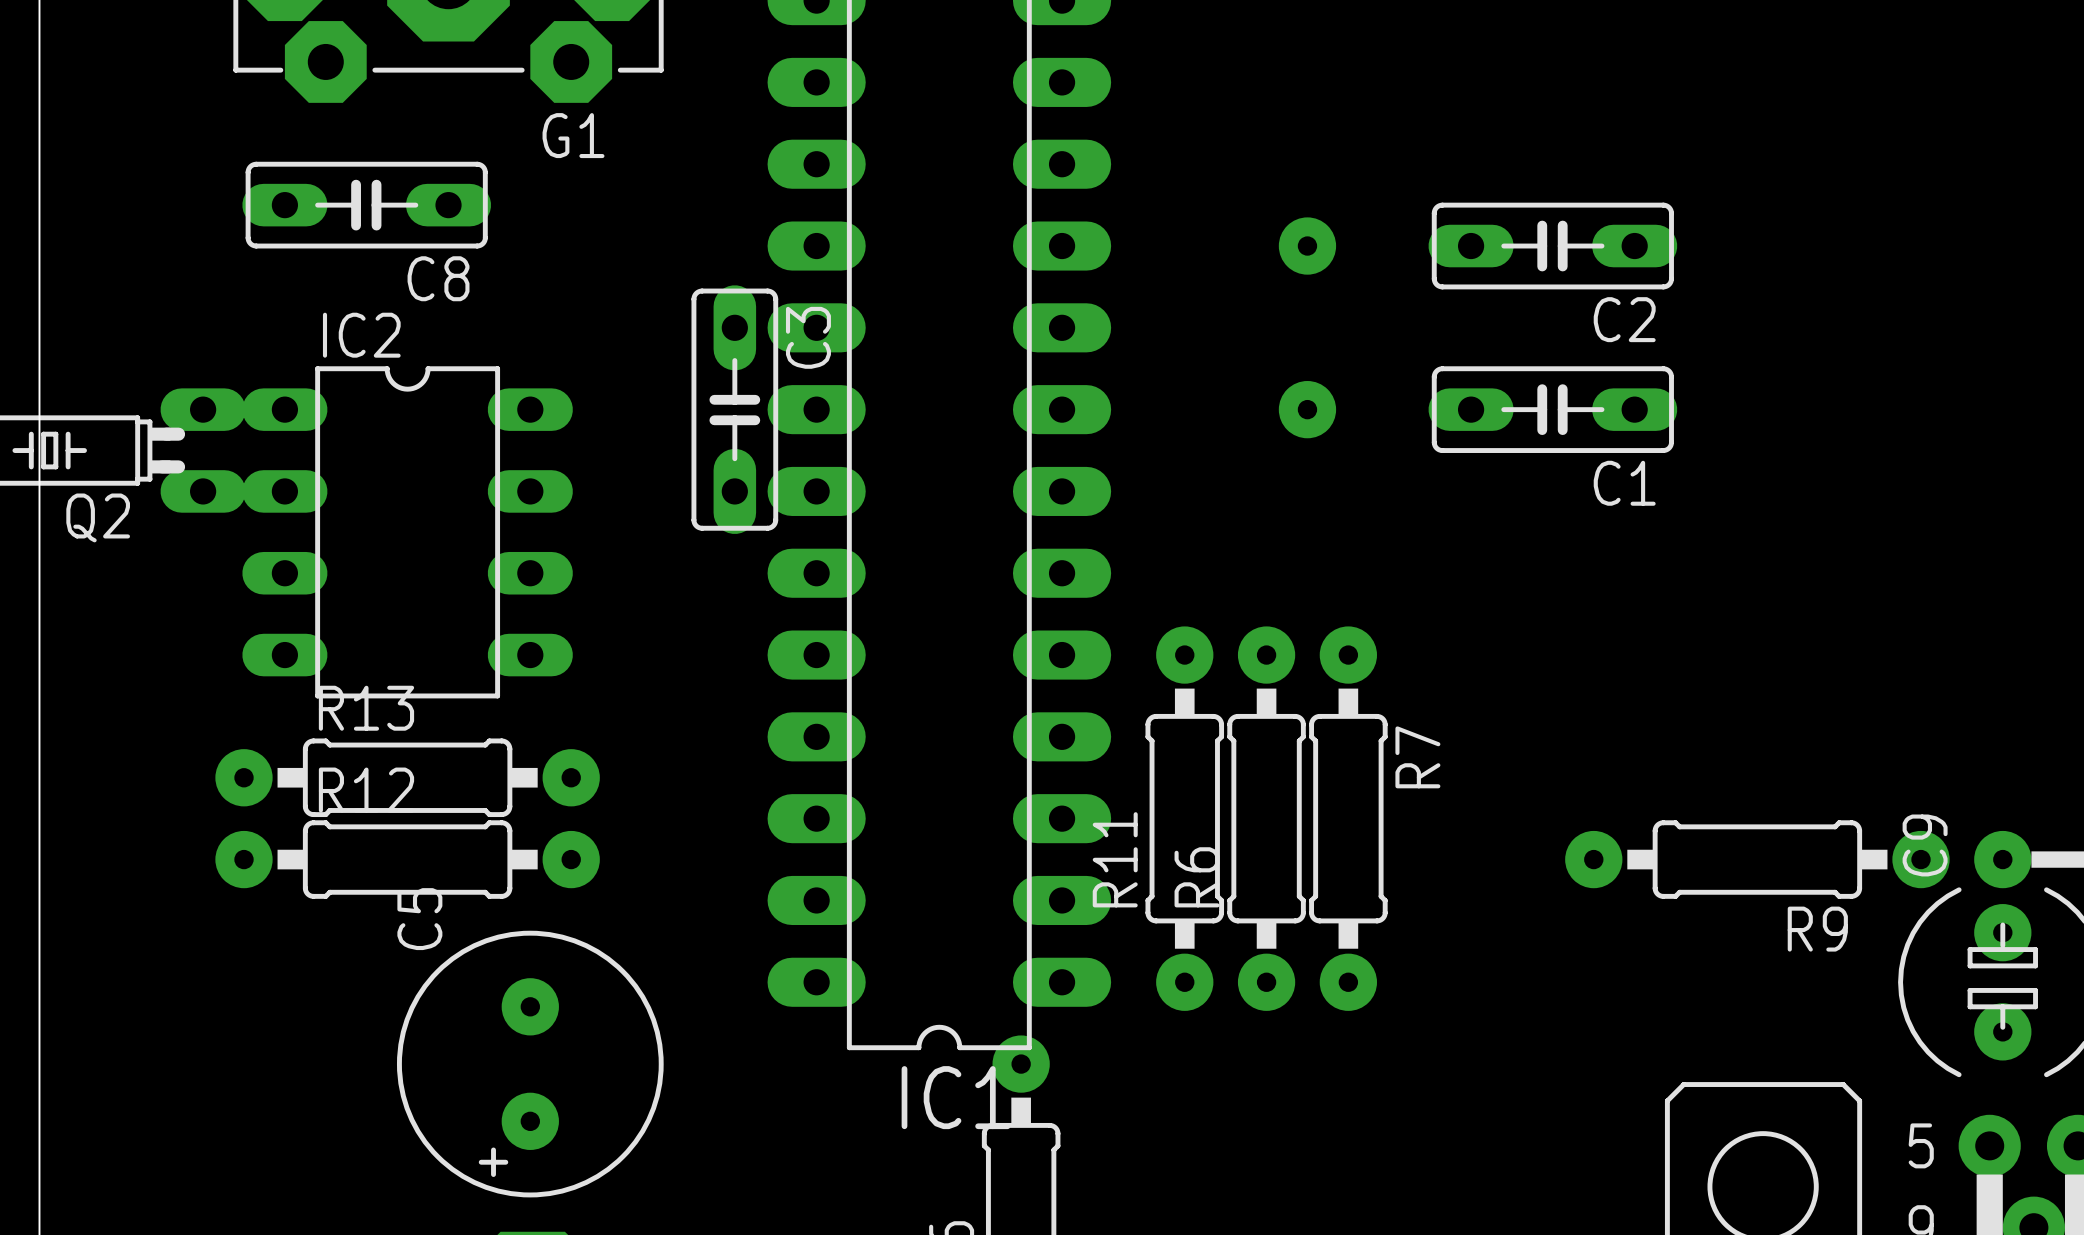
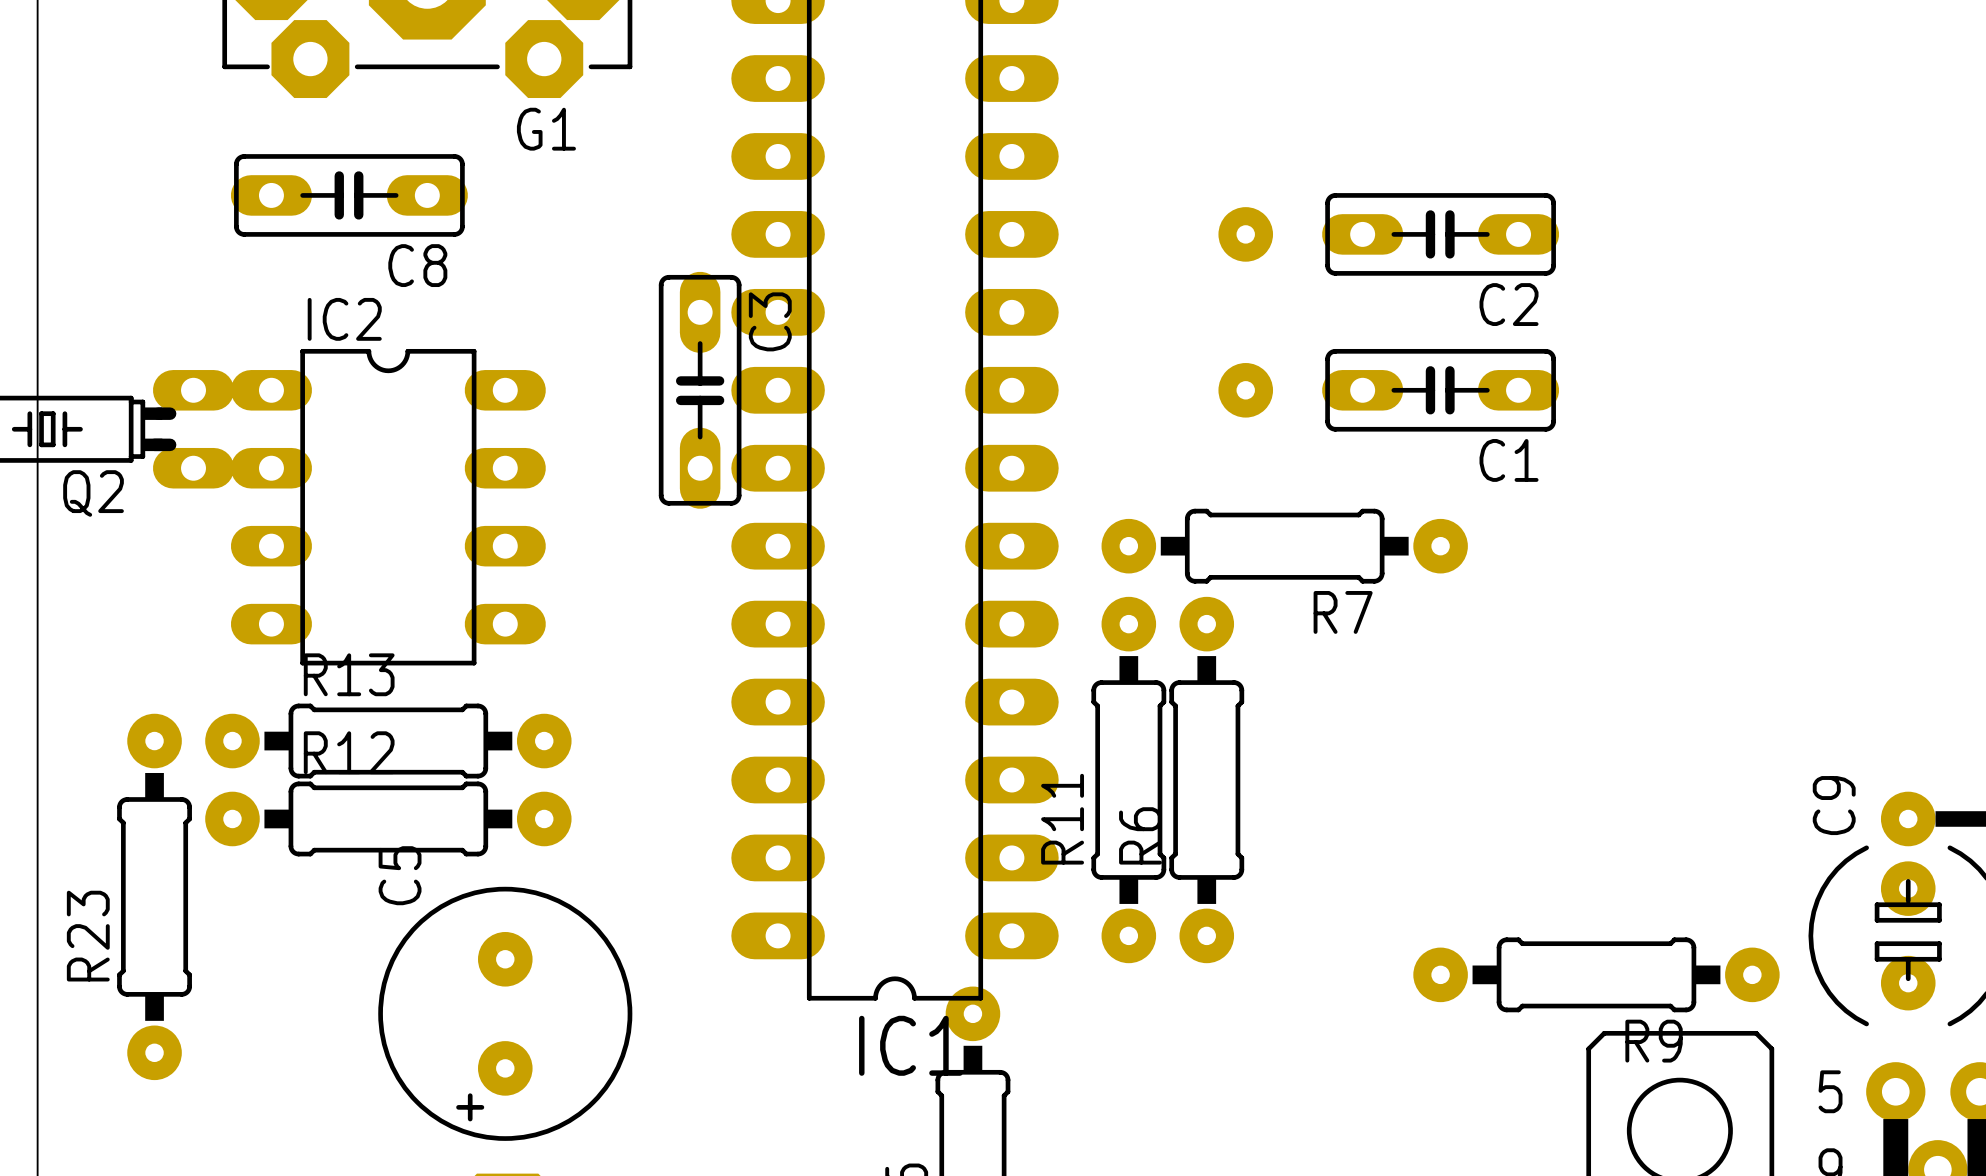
C2 position: (1552, 246) -> (1440, 234)
C1 position: (1552, 409) -> (1440, 390)
R7 rotation: 0° (1348, 818) -> 90° clockwise (1284, 546)
R7 position: (1348, 818) -> (1284, 546)
R9 position: (1757, 859) -> (1596, 974)
R23: none -> (154, 896)

